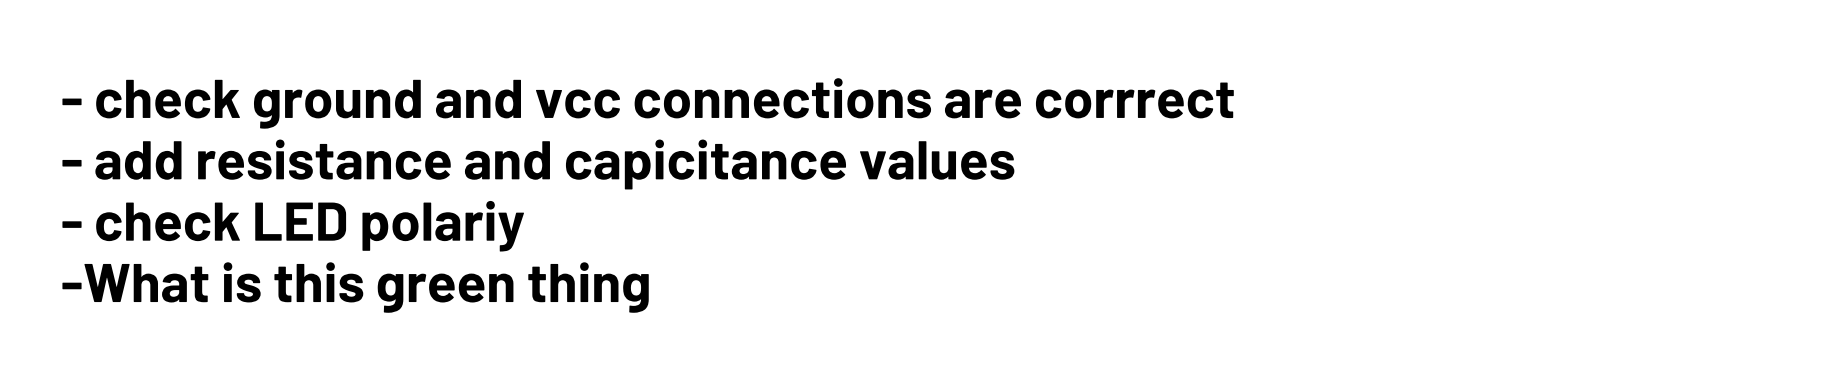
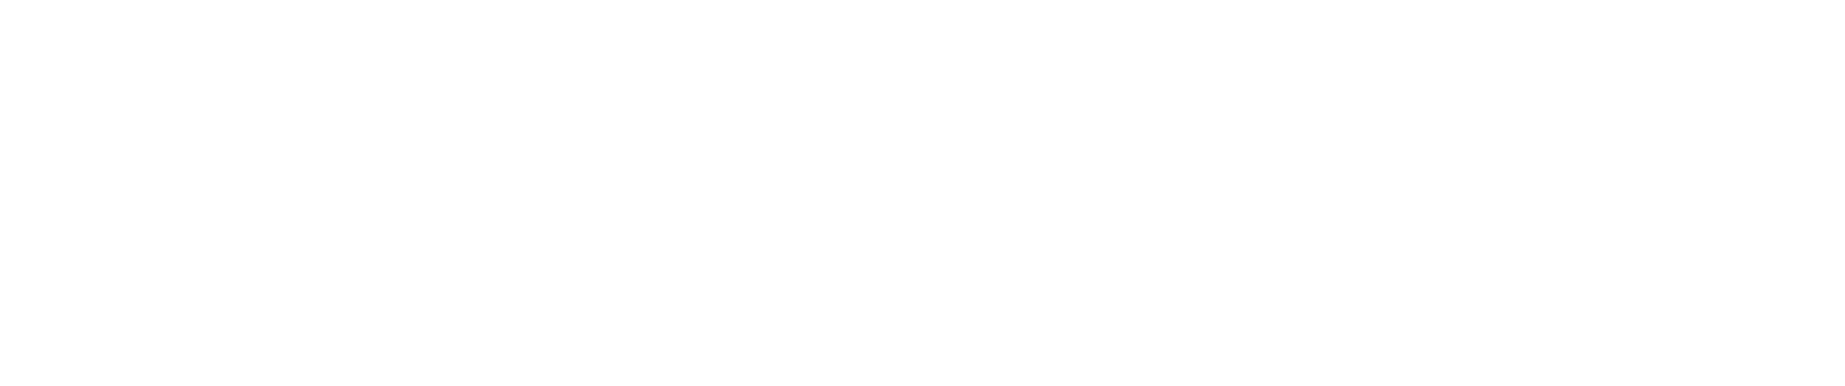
text: - check ground and vcc connections are corrrect (648, 103) -> none
text: - add resistance and capicitance values (538, 164) -> none
text: - check LED polariy (293, 226) -> none
text: -What is this green thing (355, 287) -> none

